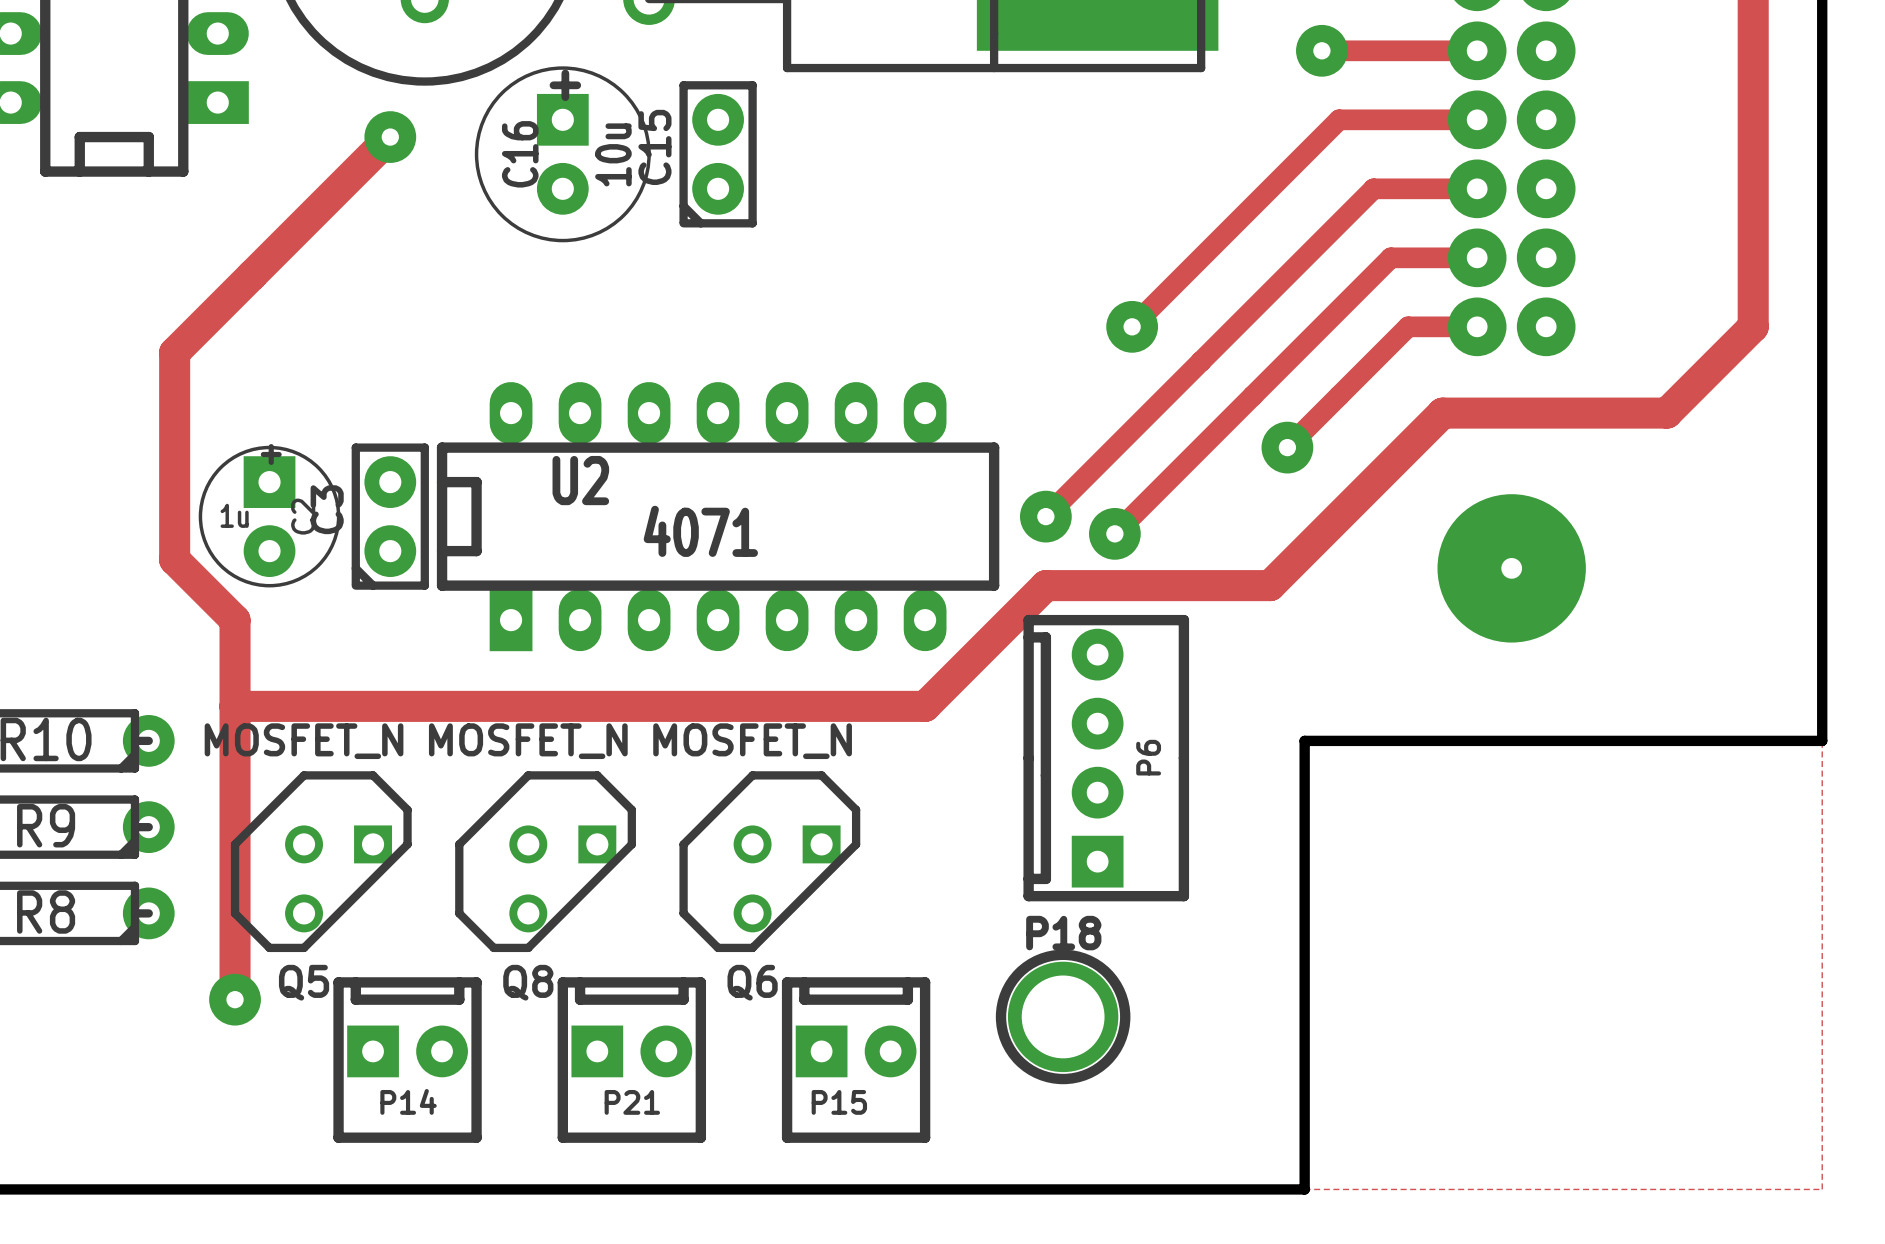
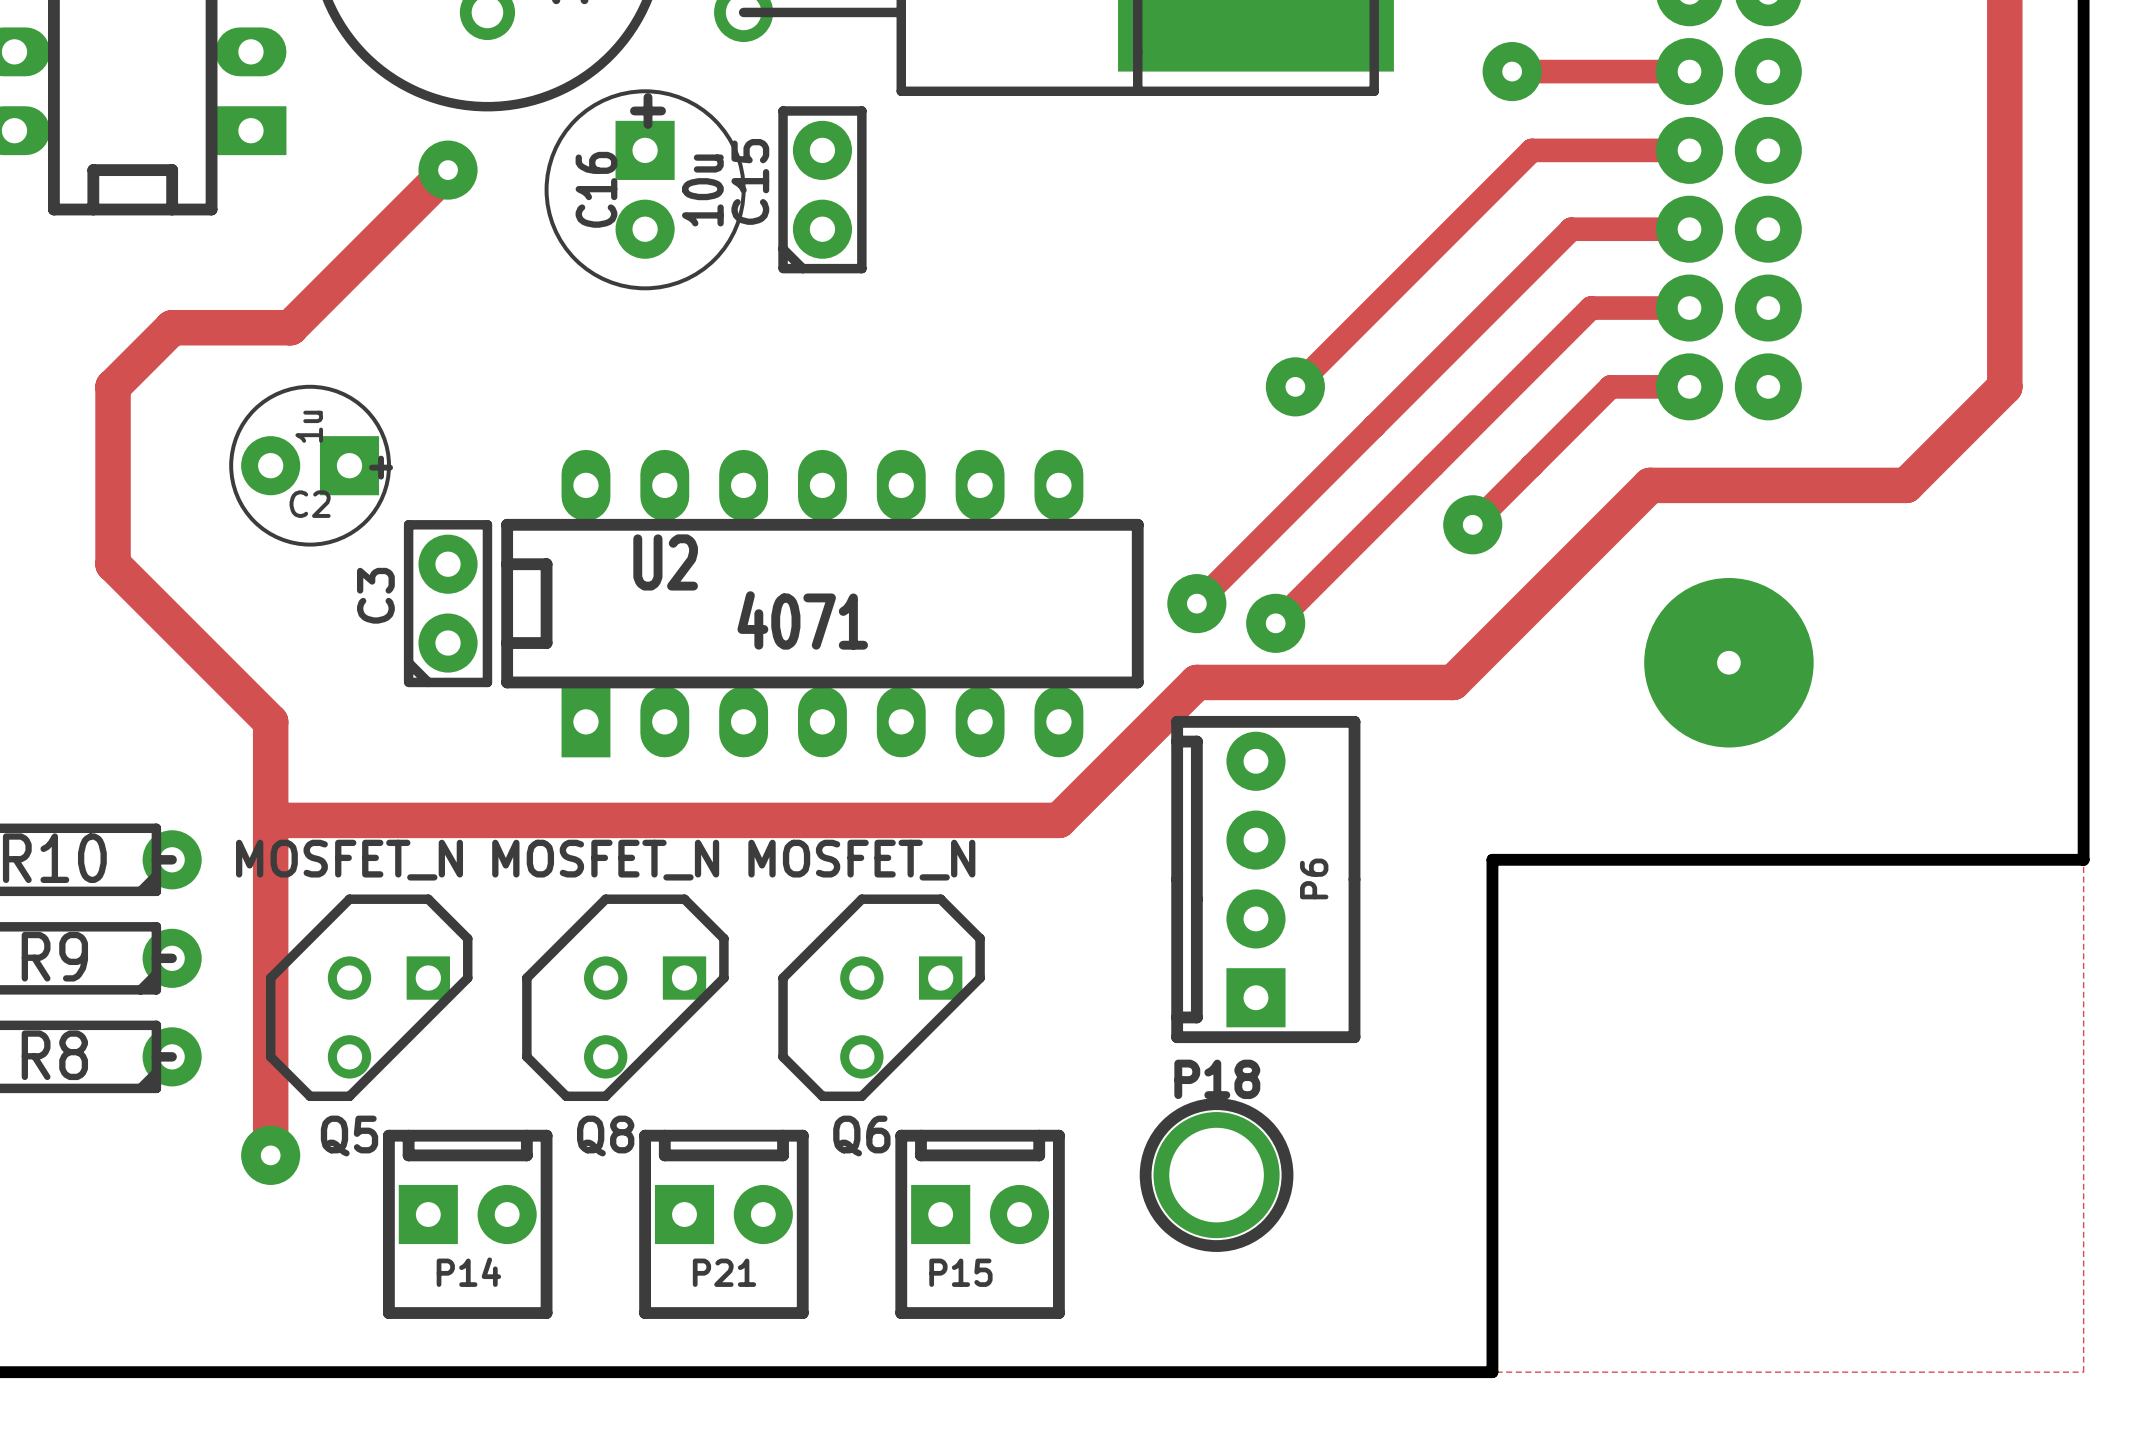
track: (252, 275) (174, 352) (174, 559) -> (290, 327) (172, 327) (113, 386) (113, 564) (201, 652)
C2 rotation: 0° (269, 516) -> 90° clockwise (310, 465)
C2 position: (269, 516) -> (310, 465)

